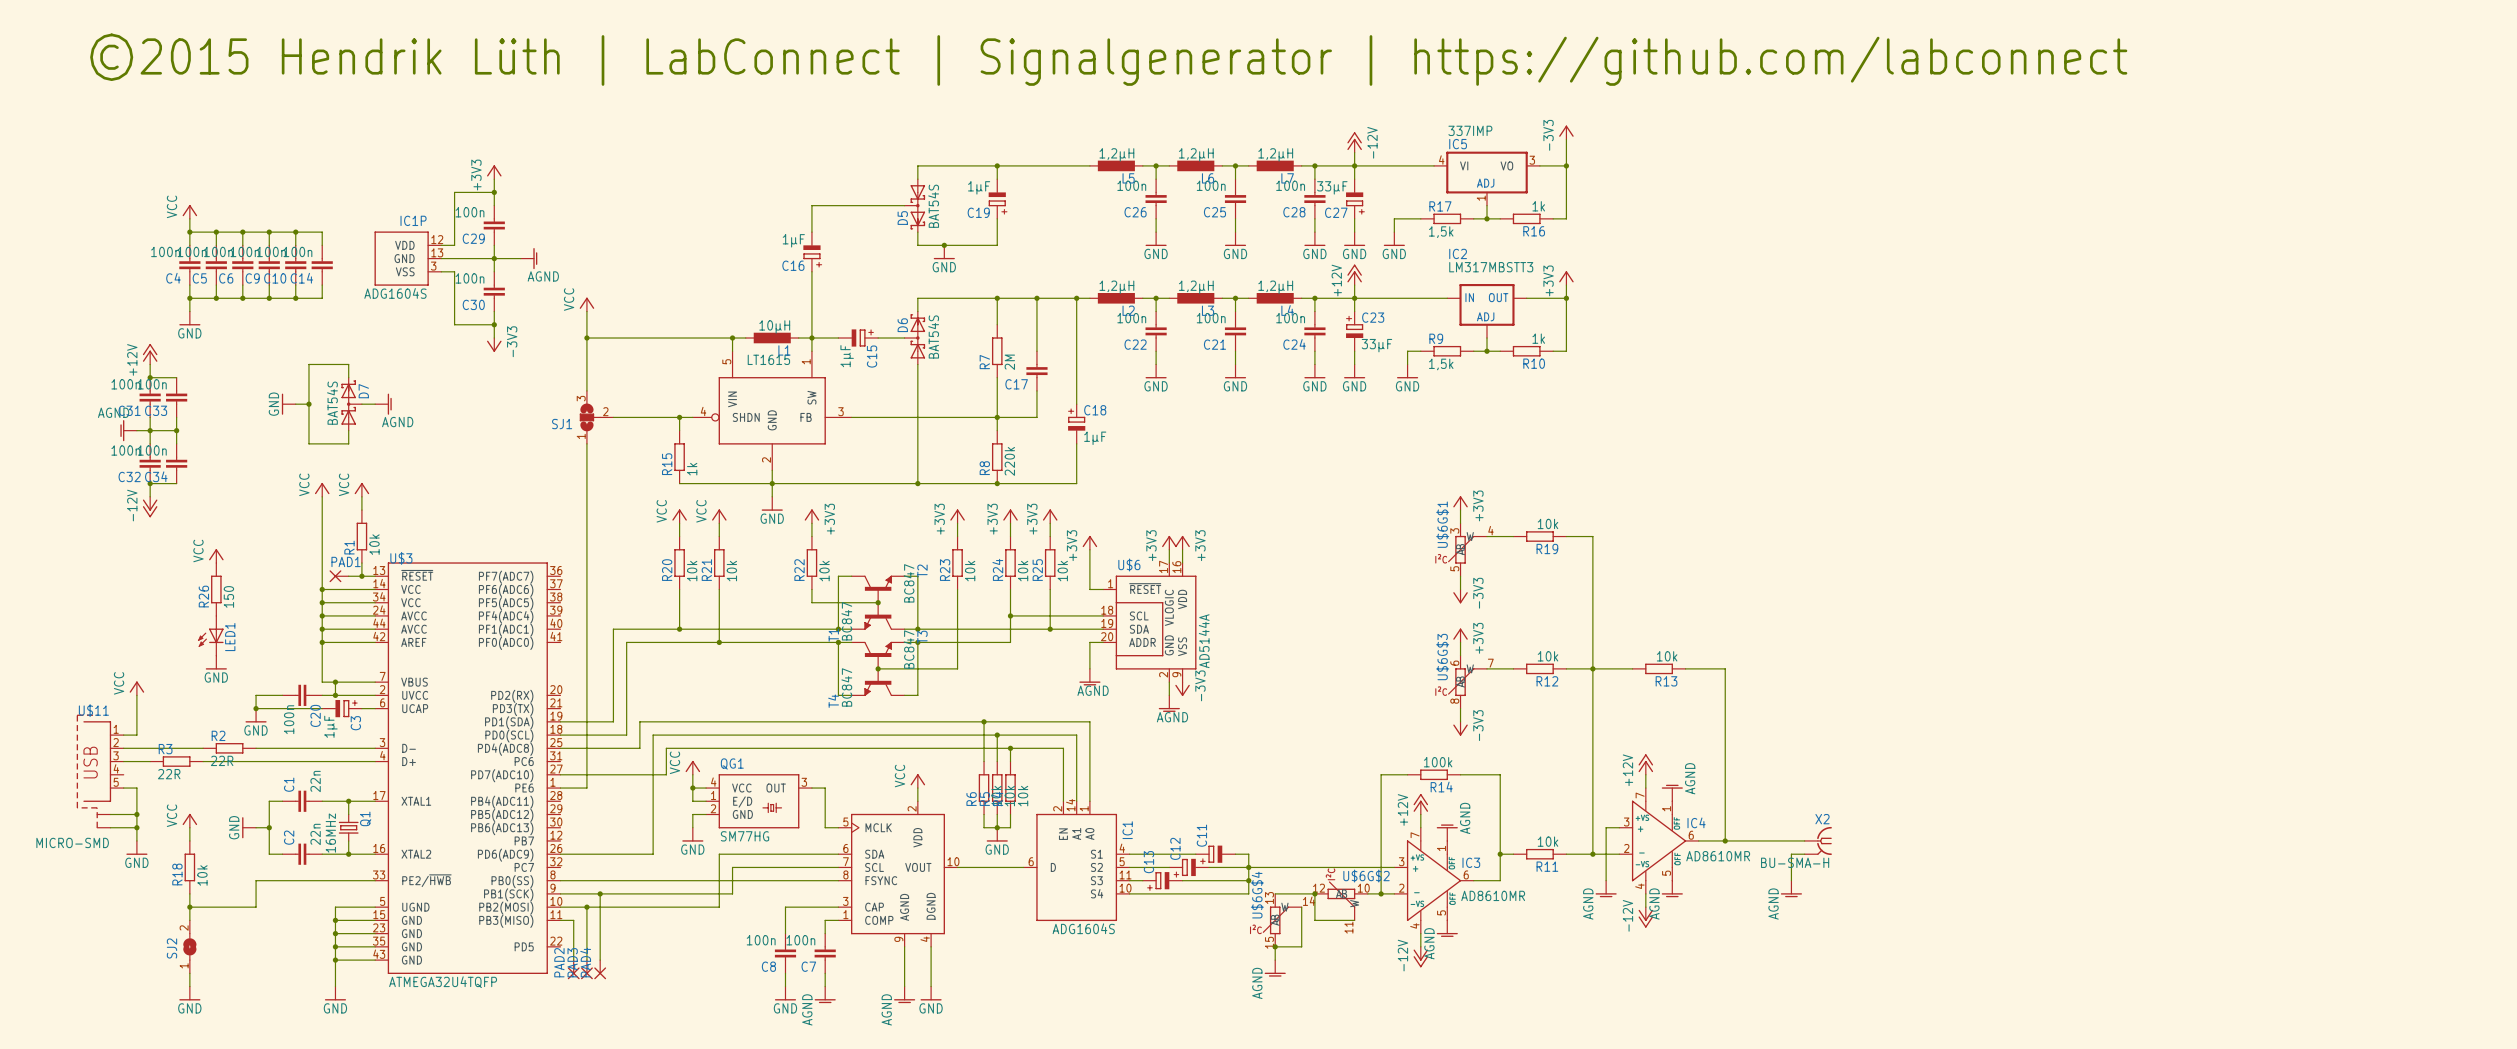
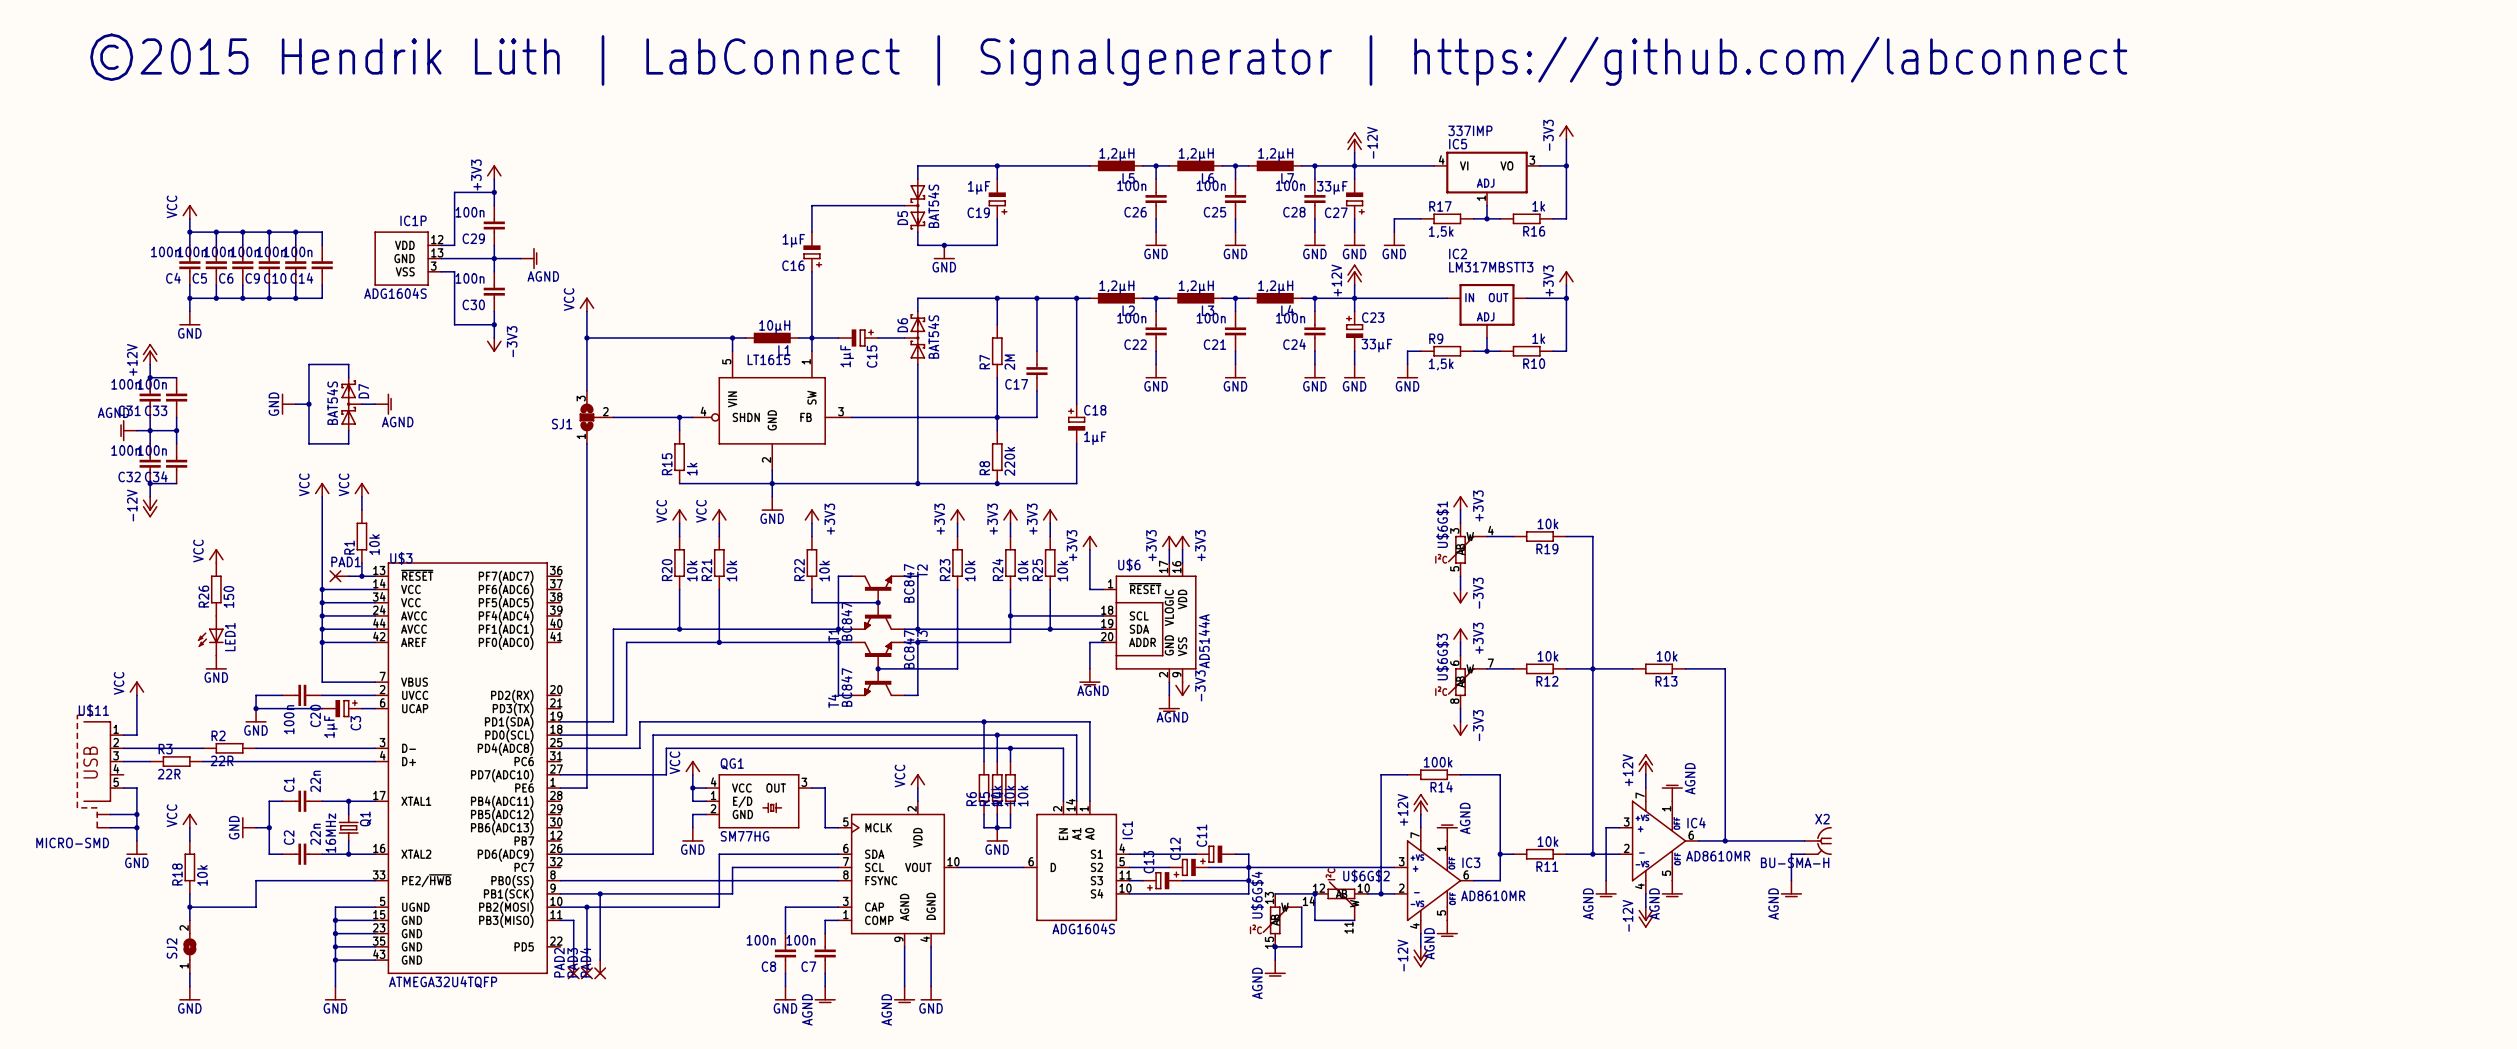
wire: (335, 682) (335, 695) -> none
junction: (335, 682) -> none
junction: (335, 695) -> none

